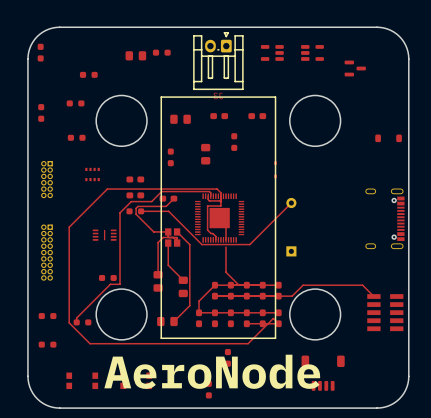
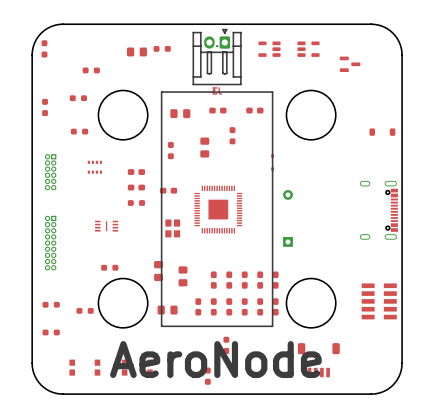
top track: (208, 196) (209, 200) (220, 199) -> none
top track: (210, 196) (209, 191) (161, 191) (151, 201) (131, 201) (120, 212) (120, 284) (110, 284) (76, 318) (76, 322) -> none
top track: (173, 198) (166, 206) (138, 206) (136, 208) (136, 214) (153, 231) (168, 231) (168, 237) -> none
top track: (291, 203) (249, 244) (201, 244) (168, 211) (141, 211) -> none
top track: (219, 218) (226, 224) (226, 239) -> none
top track: (177, 231) (189, 244) (189, 305) (174, 321) -> none
top track: (173, 237) (177, 241) -> none
top track: (215, 239) (215, 236) (207, 230) (207, 206) (220, 206) (220, 192) (217, 189) (107, 189) (69, 227) (69, 322) (90, 343) (248, 343) (273, 318) (278, 323) (246, 323) -> none
top track: (168, 243) (168, 265) (183, 280) -> none
top track: (177, 243) (176, 237) (163, 237) (158, 242) (158, 274) -> none
top track: (226, 247) (226, 272) (238, 285) -> none
top track: (278, 285) (214, 285) (199, 301) (199, 312) (278, 312) -> none
top track: (214, 296) (292, 296) (303, 285) (362, 285) (373, 296) -> none

